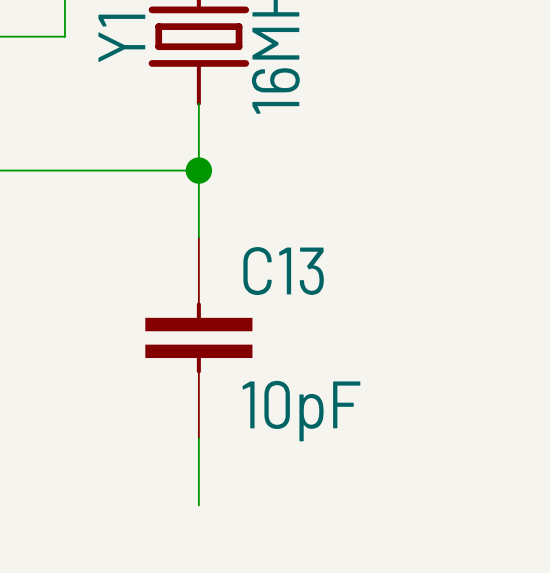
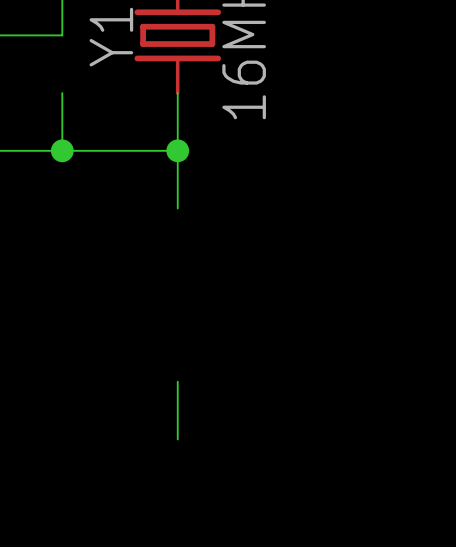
wire: none -> (62, 93) (62, 150)
junction: none -> (62, 150)
C13: 10pF (198, 337) -> none

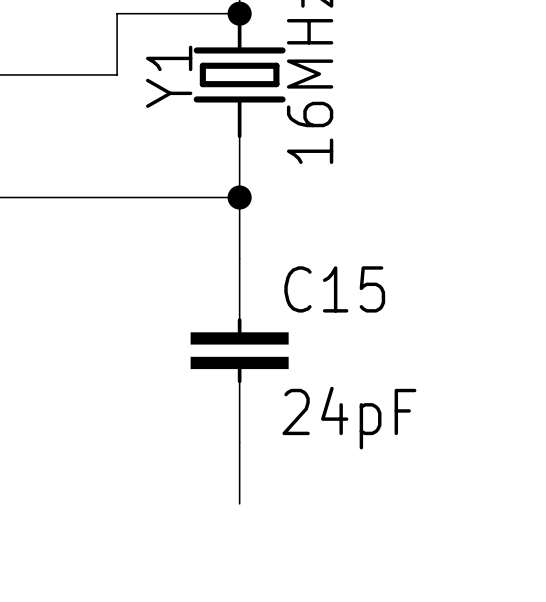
wire: (62, 93) (62, 150) -> none
junction: (62, 150) -> none
C15: none -> 24pF (239, 350)

